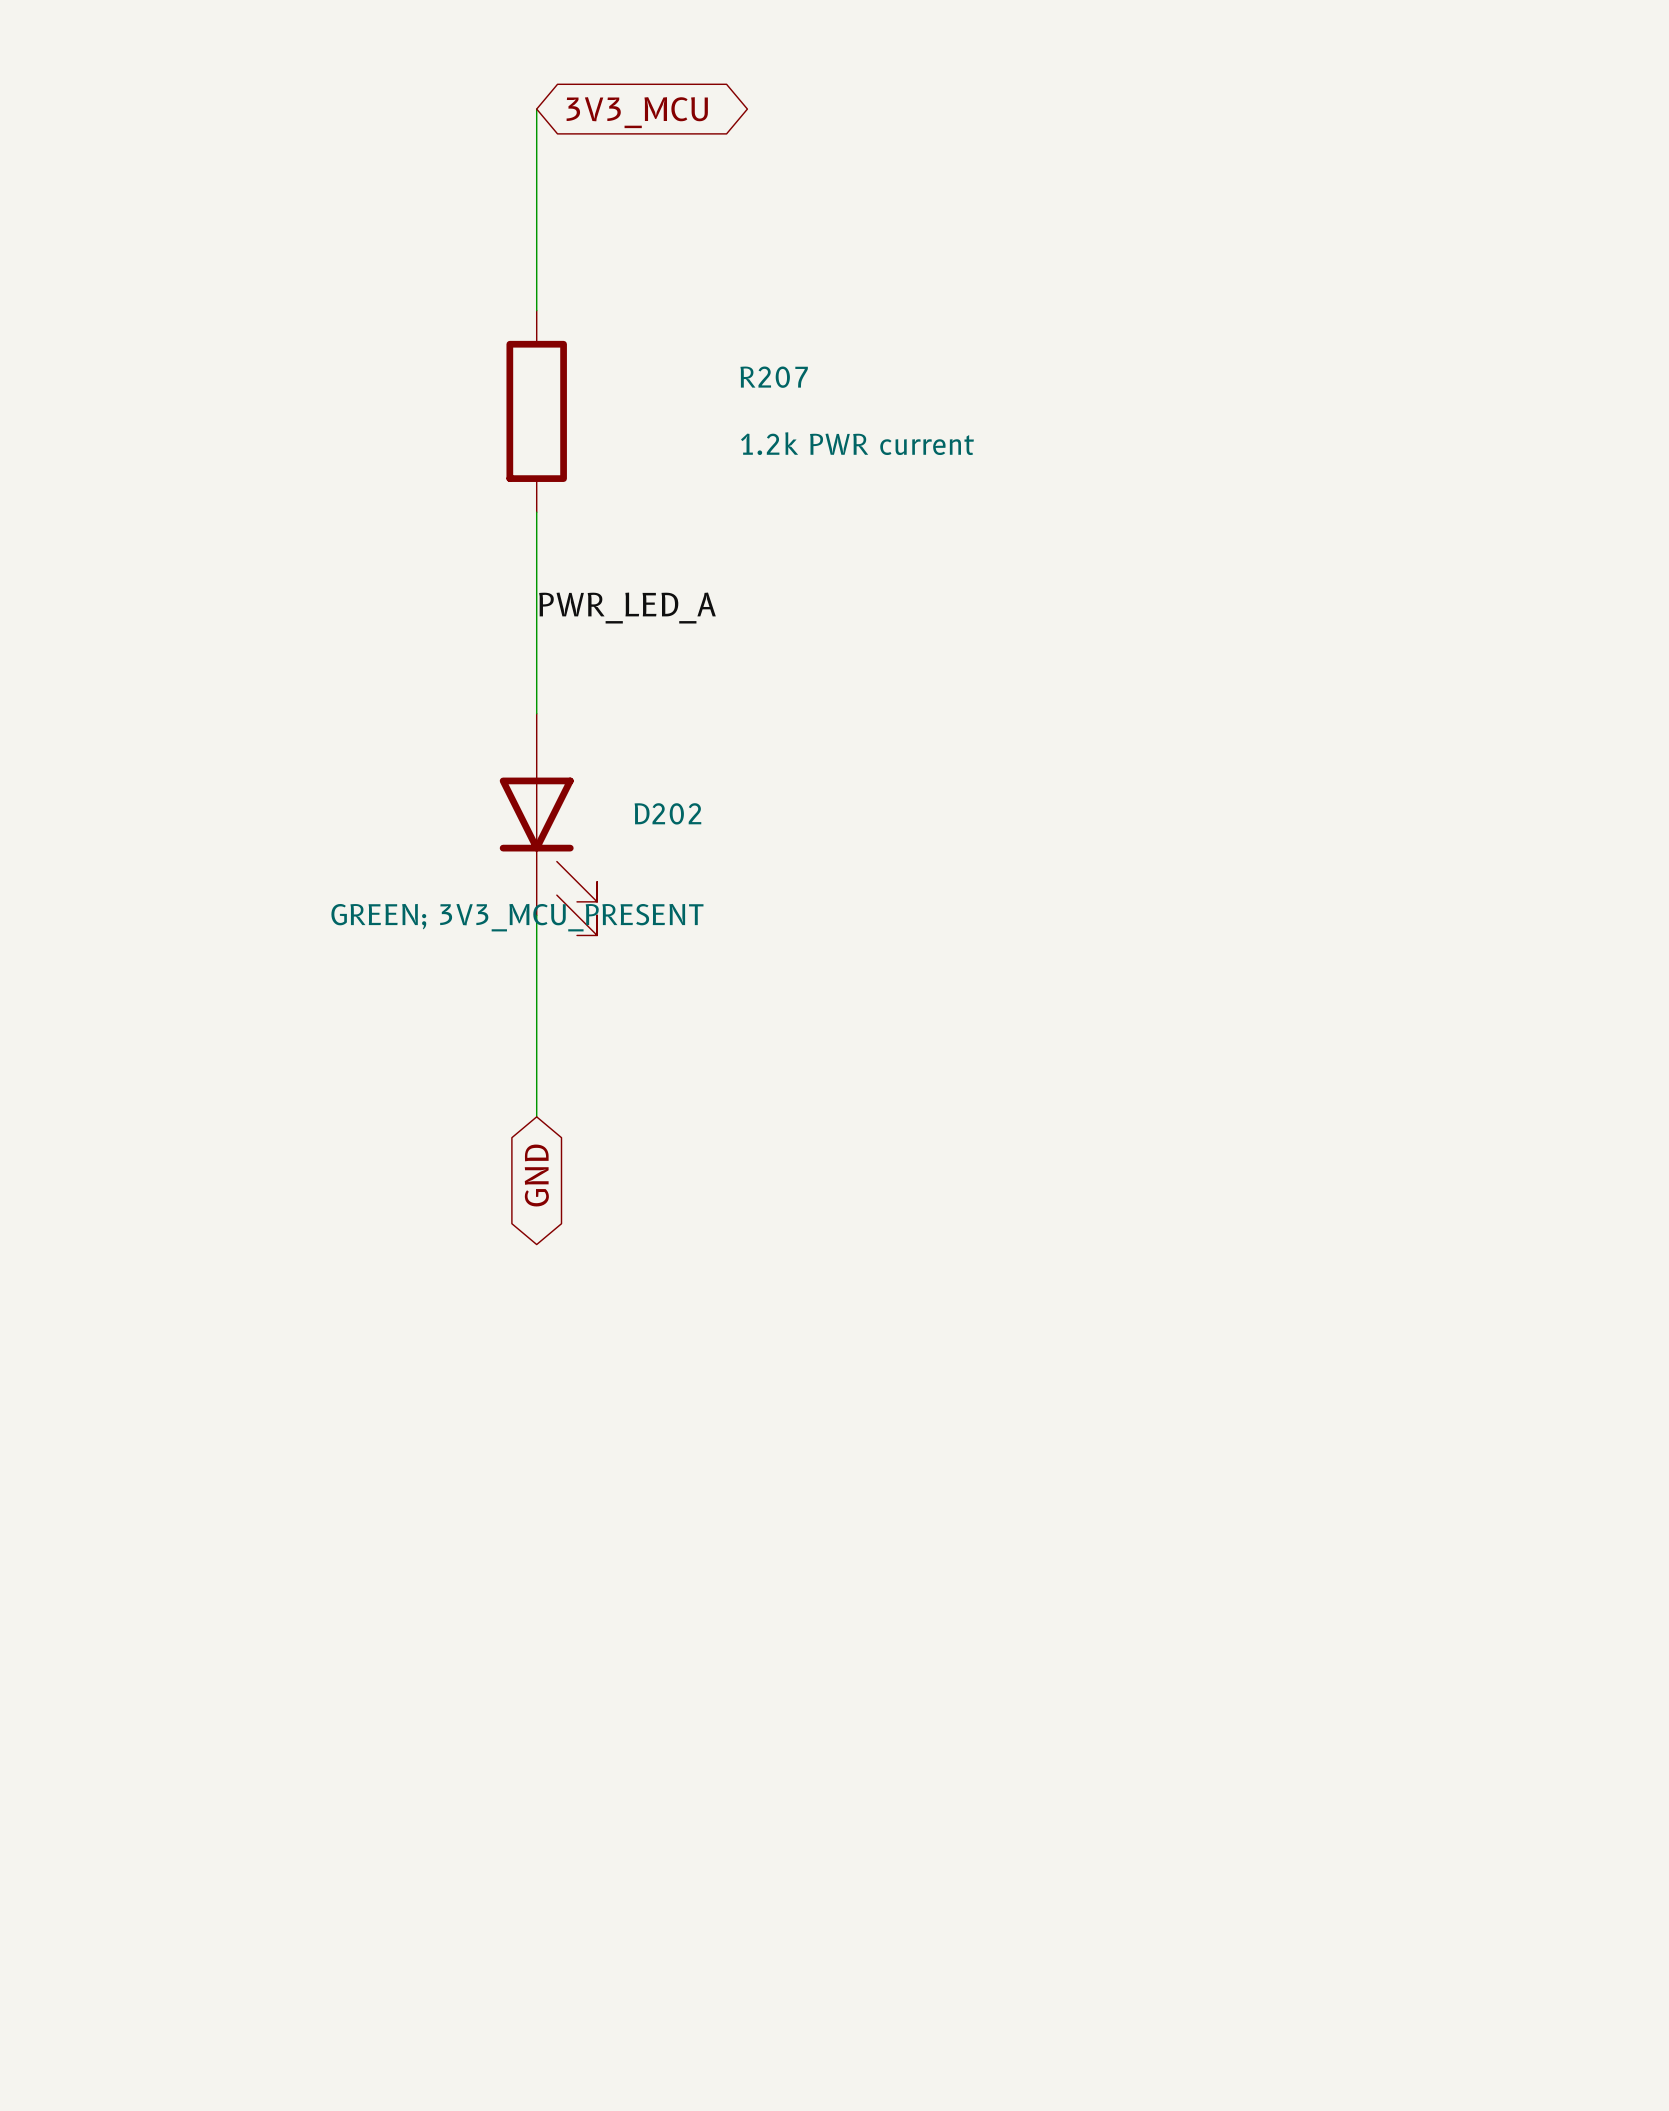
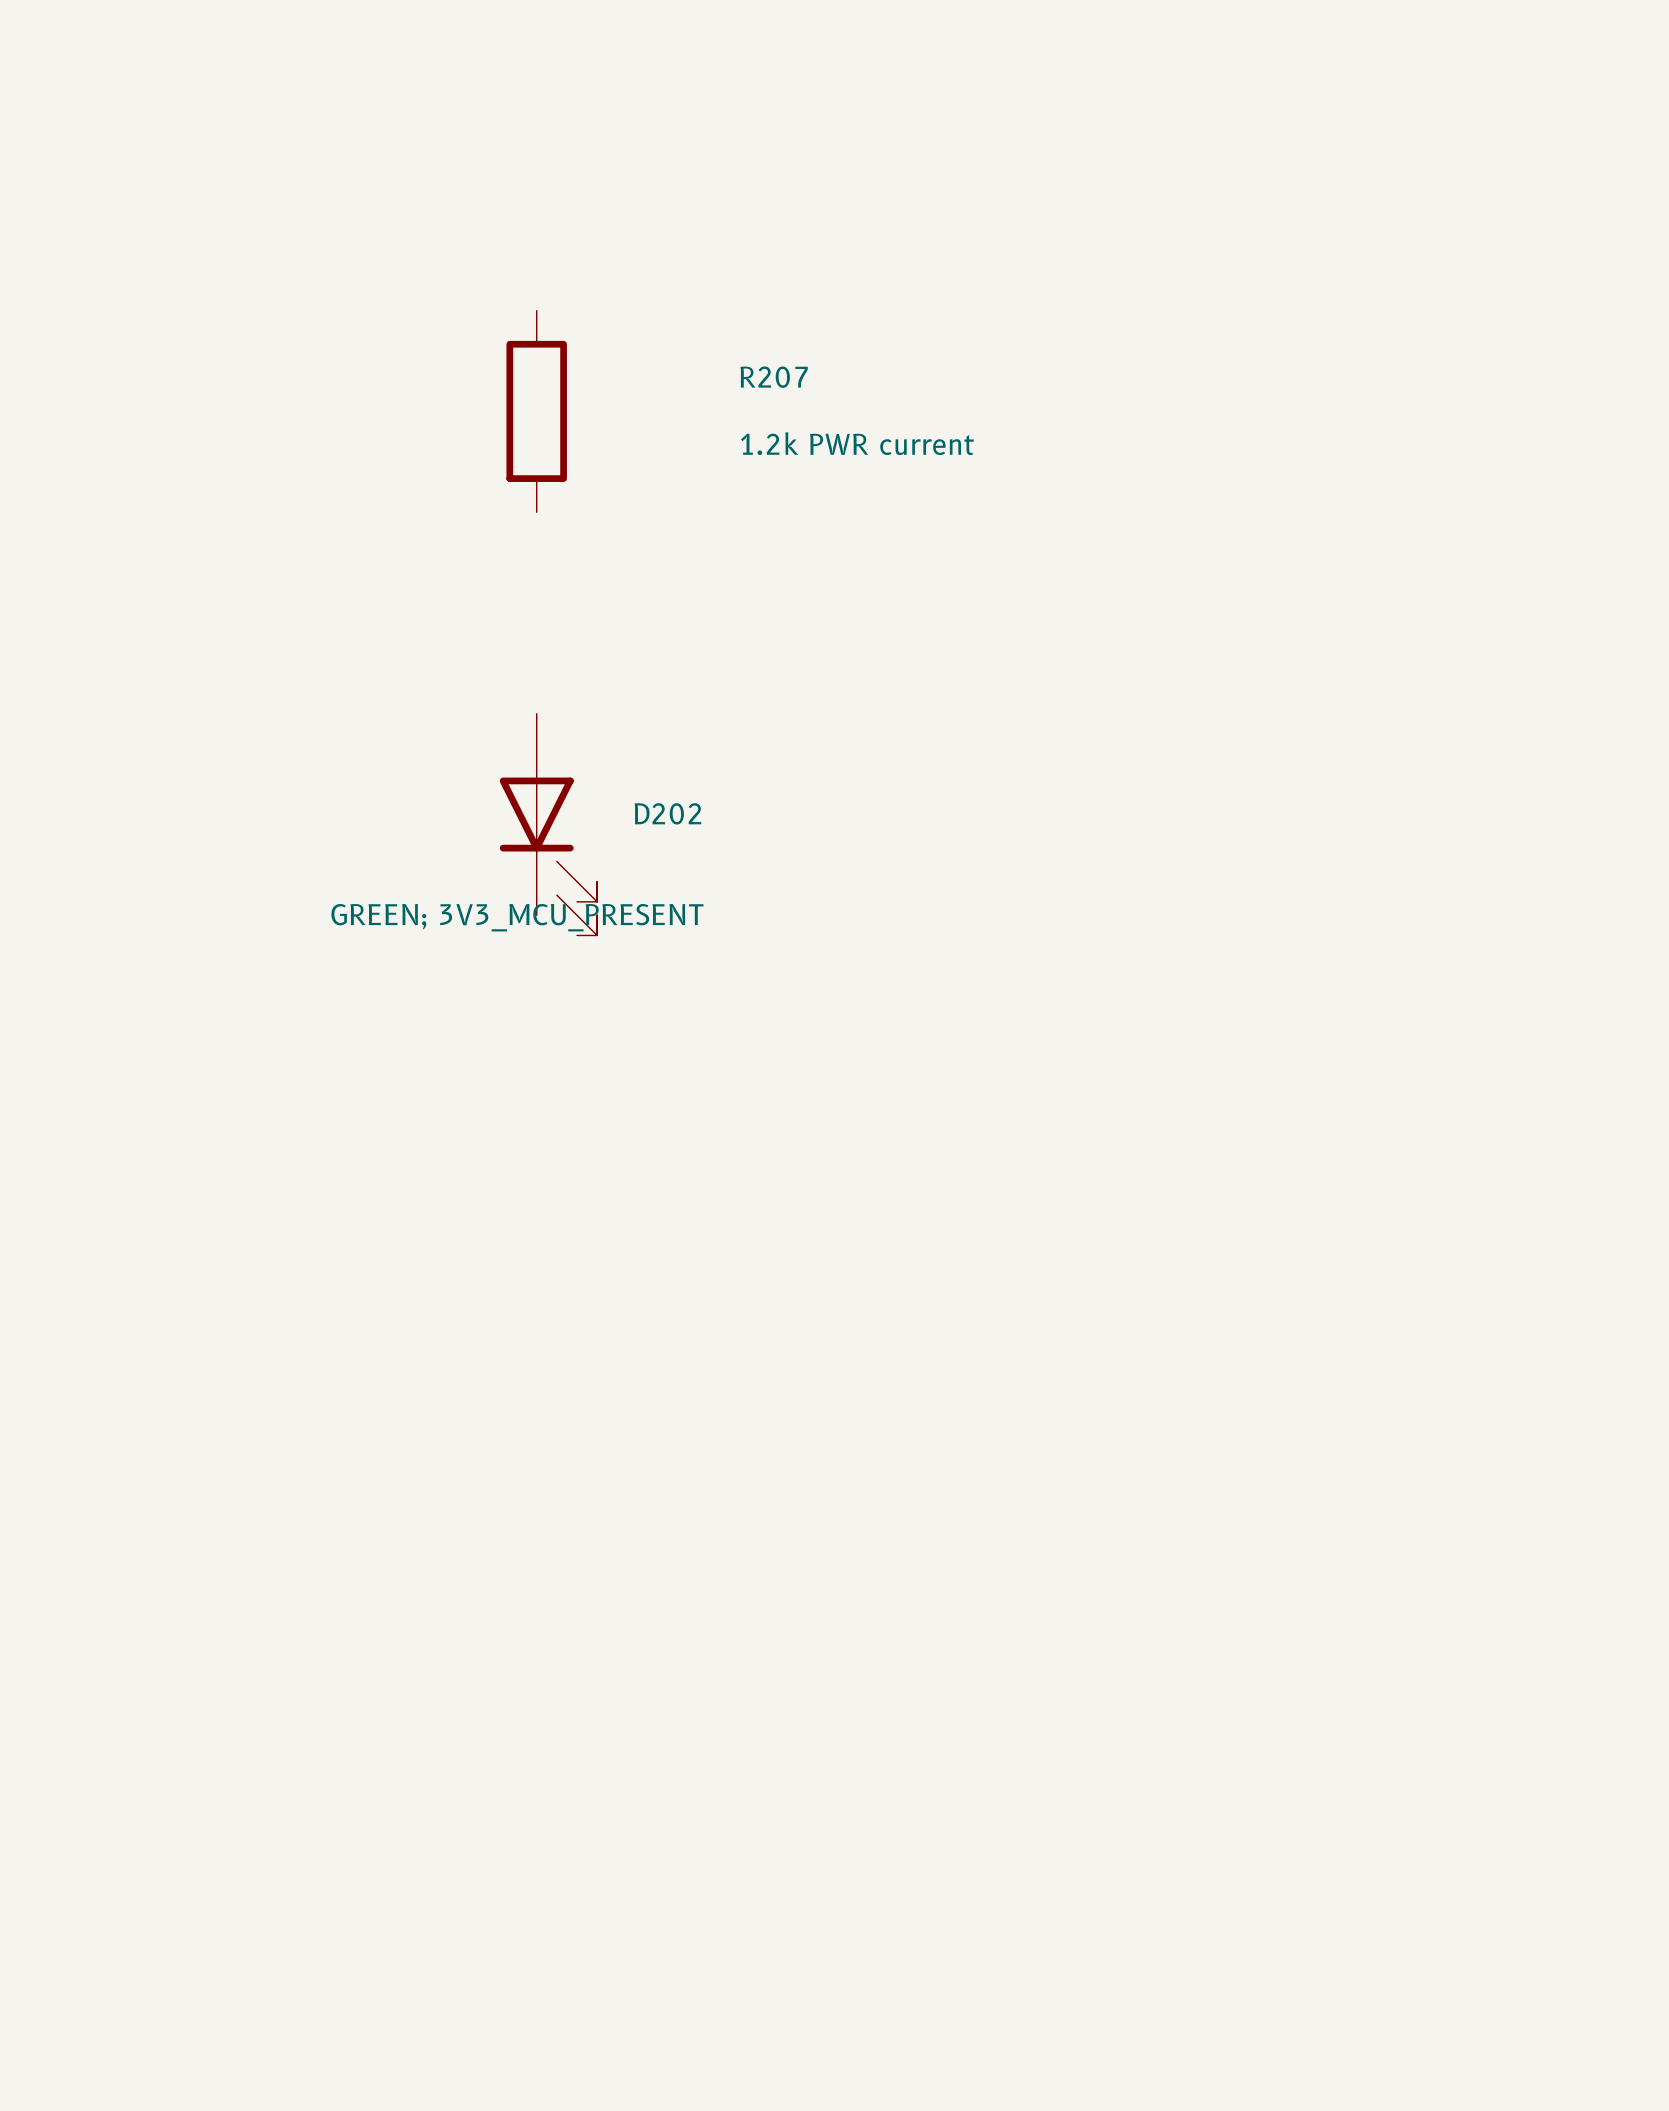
wire: (536, 109) (536, 310) -> none
global label: 3V3_MCU (637, 112) -> none
wire: (536, 512) (536, 713) -> none
label: PWR_LED_A (627, 608) -> none
wire: (536, 915) (536, 1116) -> none
global label: GND (536, 1175) -> none

